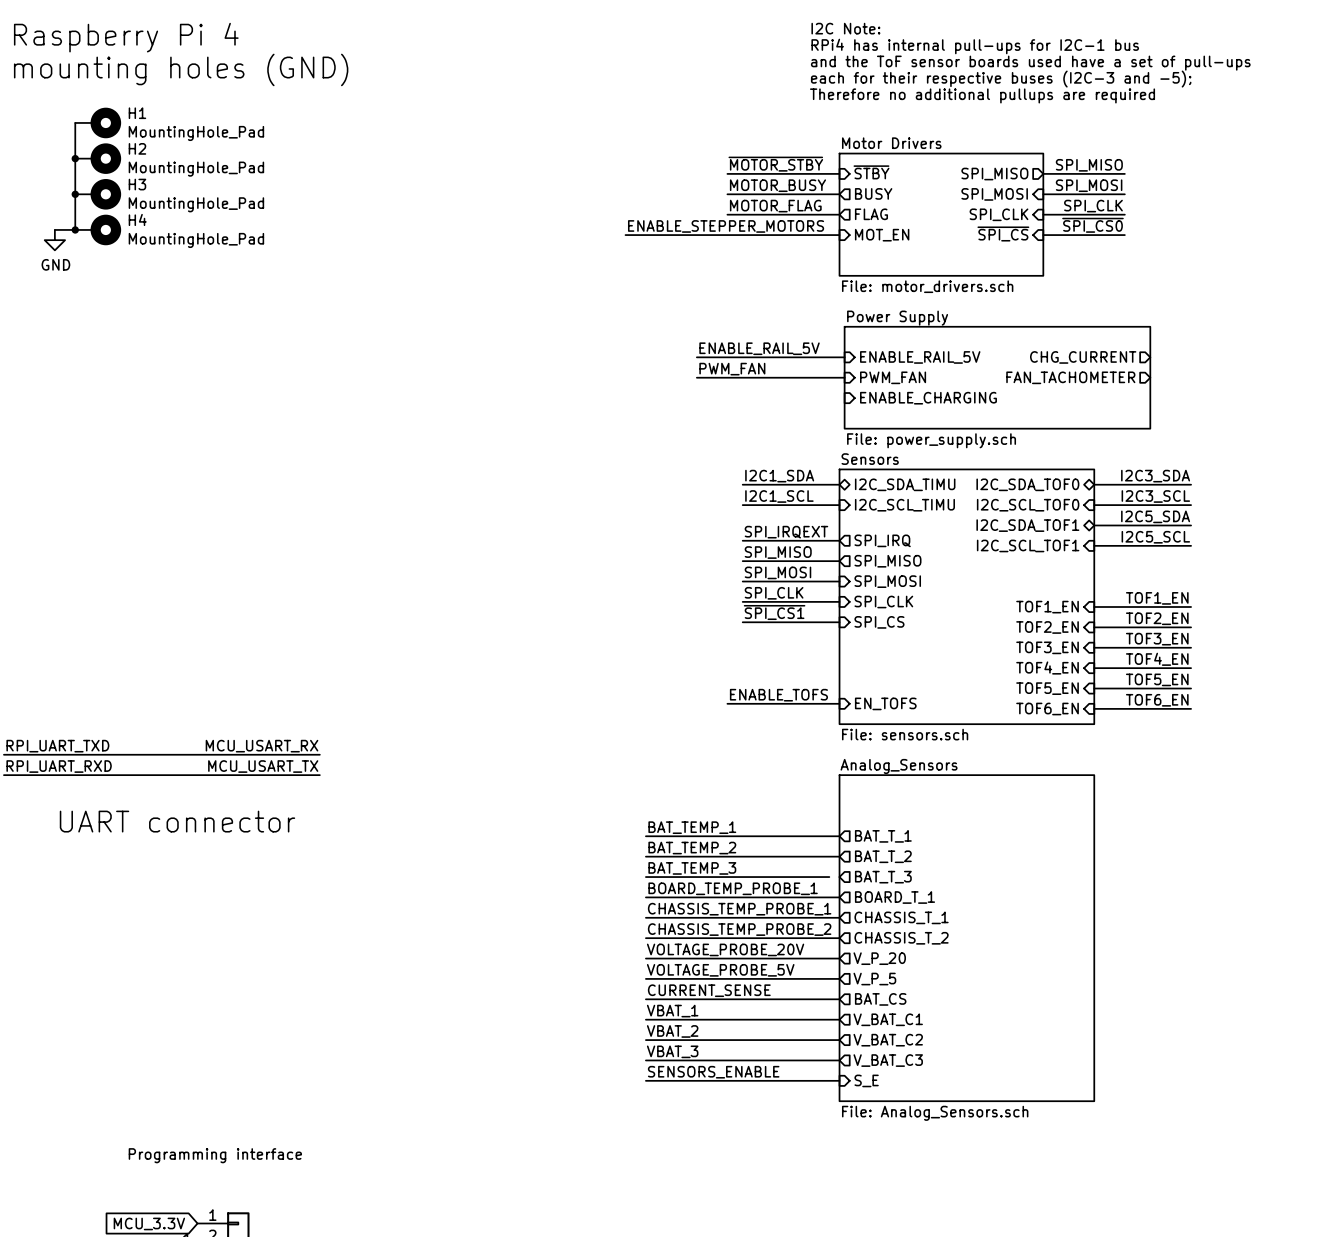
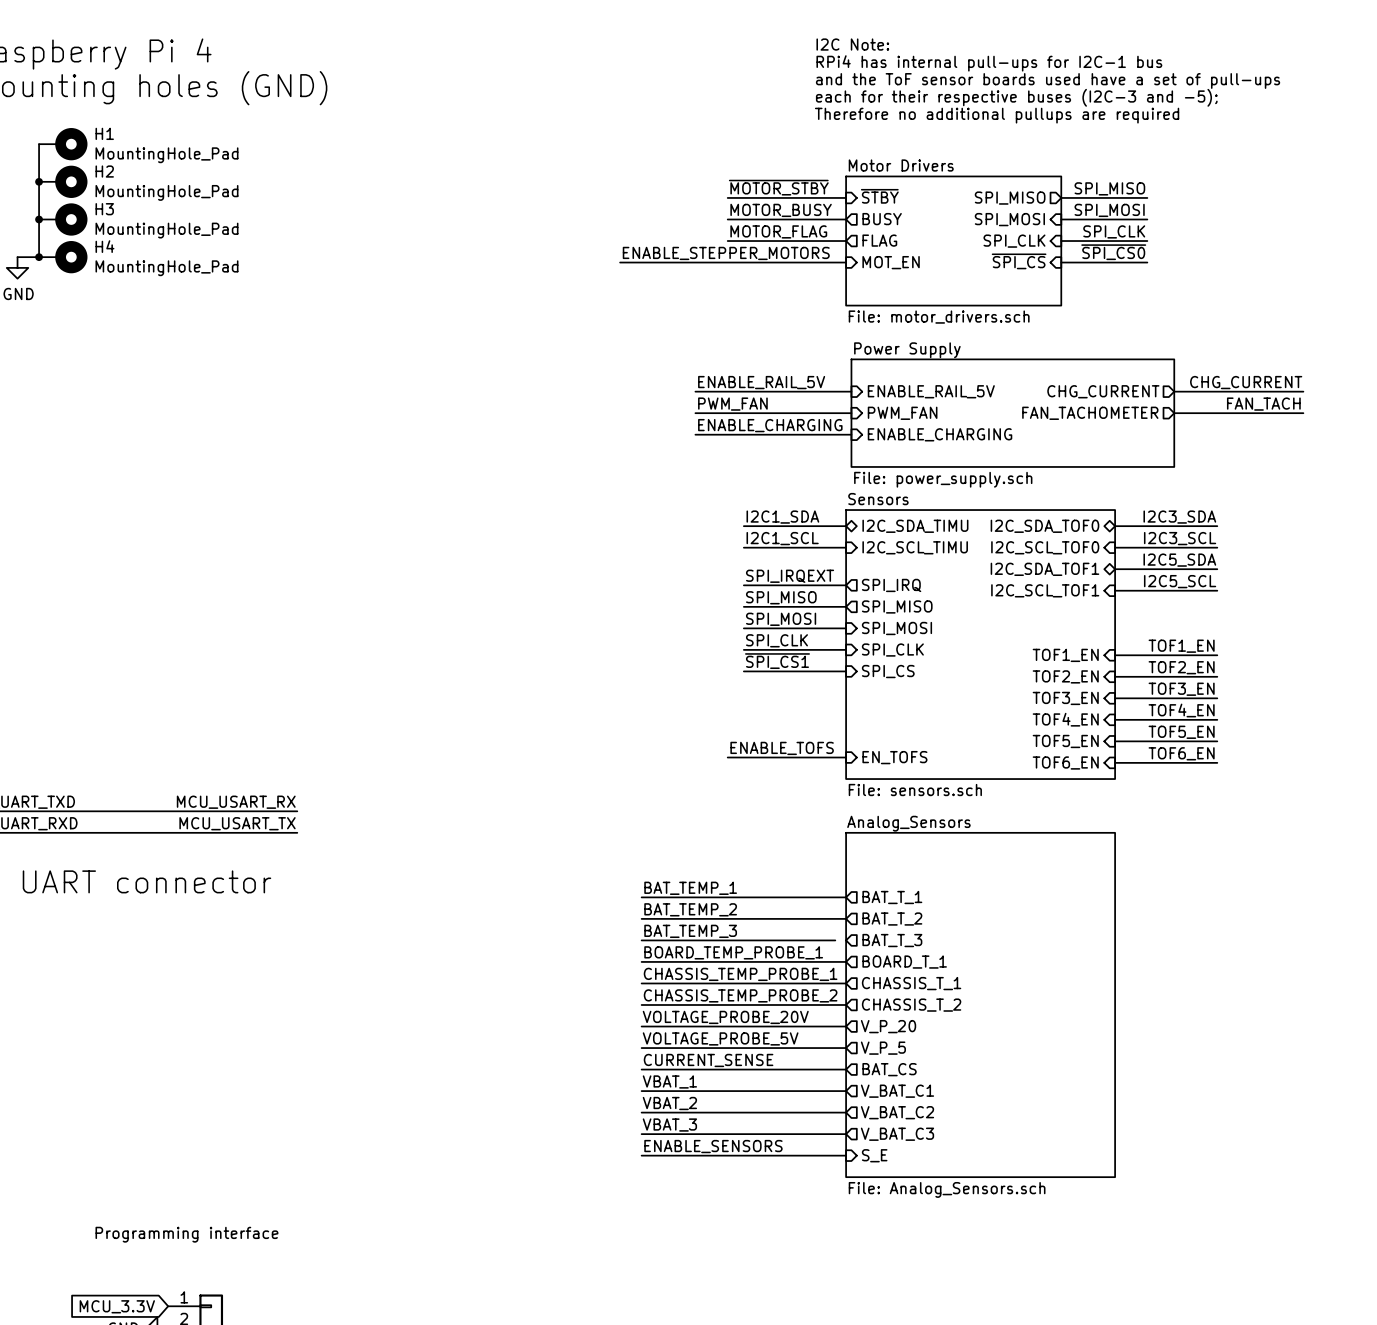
label: none -> CHG_CURRENT (1246, 382)
wire: none -> (1174, 391) (1303, 391)
label: none -> FAN_TACH (1263, 404)
wire: none -> (1174, 413) (1303, 413)
label: none -> ENABLE_CHARGING (770, 425)
wire: none -> (695, 434) (851, 434)
label: SENSORS_ENABLE (713, 1072) -> ENABLE_SENSORS (713, 1146)

